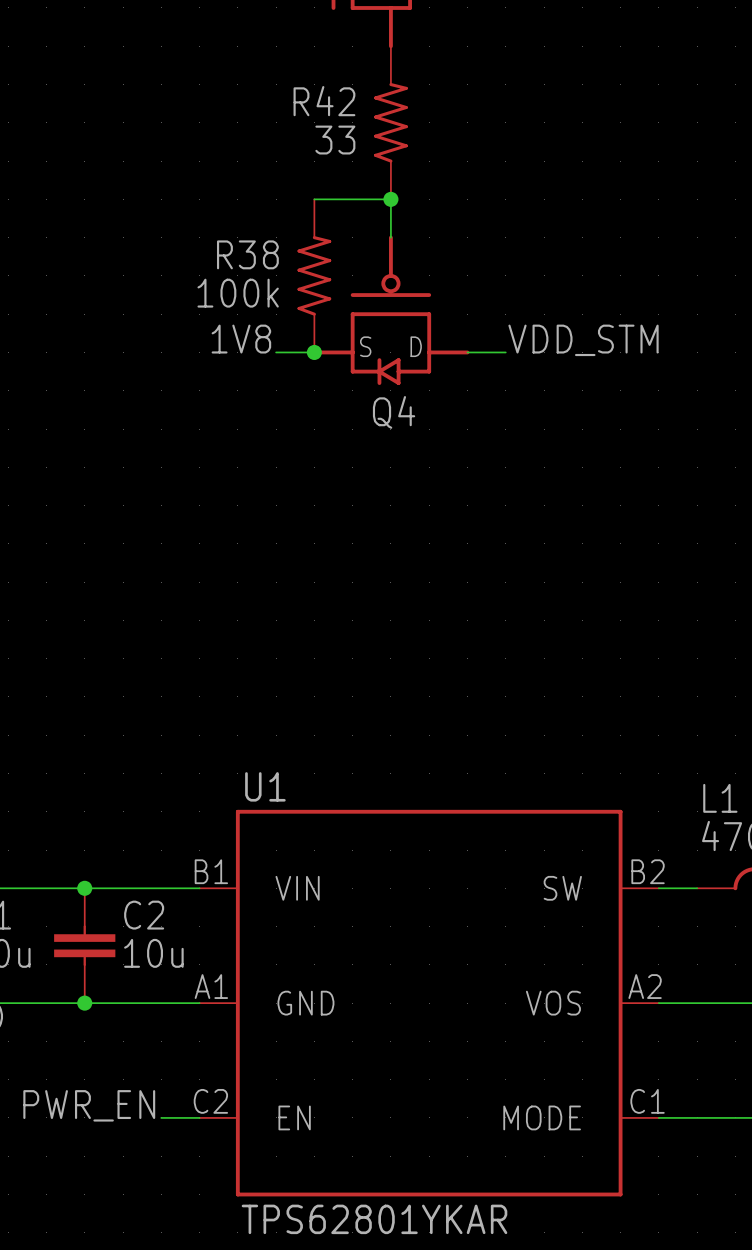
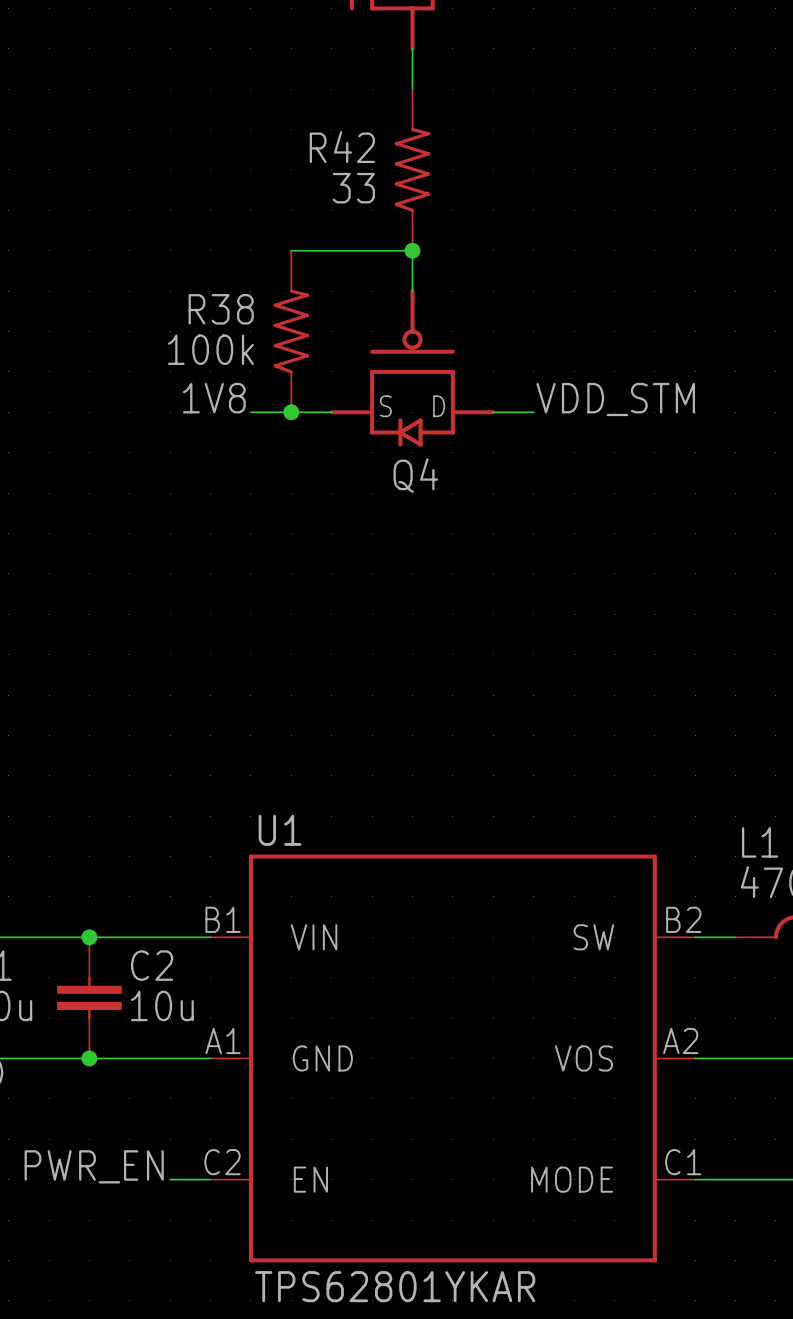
R42 position: (390, 122) -> (412, 169)
wire: (314, 199) (390, 199) (390, 237) -> none
junction position: (390, 199) -> (412, 250)
wire: none -> (291, 250) (412, 250) (412, 291)
R38 position: (314, 275) -> (291, 331)
Q4 position: (390, 310) -> (412, 367)
label position: 1V8 (241, 339) -> 1V8 (214, 398)
label position: VDD_STM (583, 340) -> VDD_STM (615, 399)
wire: (276, 352) (314, 352) -> none
junction position: (314, 352) -> (291, 412)
wire: (467, 352) (505, 352) -> (493, 412) (533, 412)
wire: none -> (250, 412) (331, 412)

